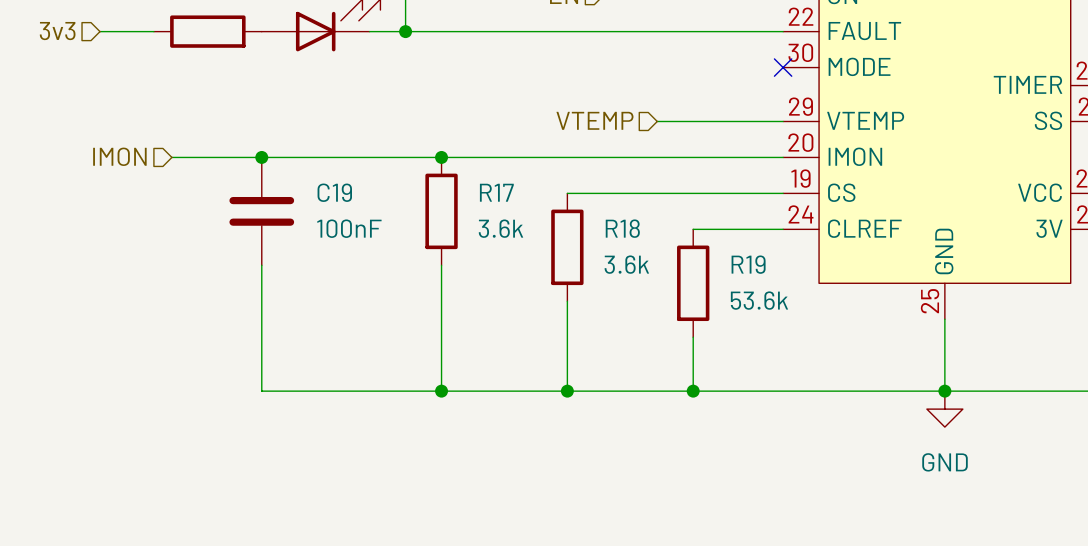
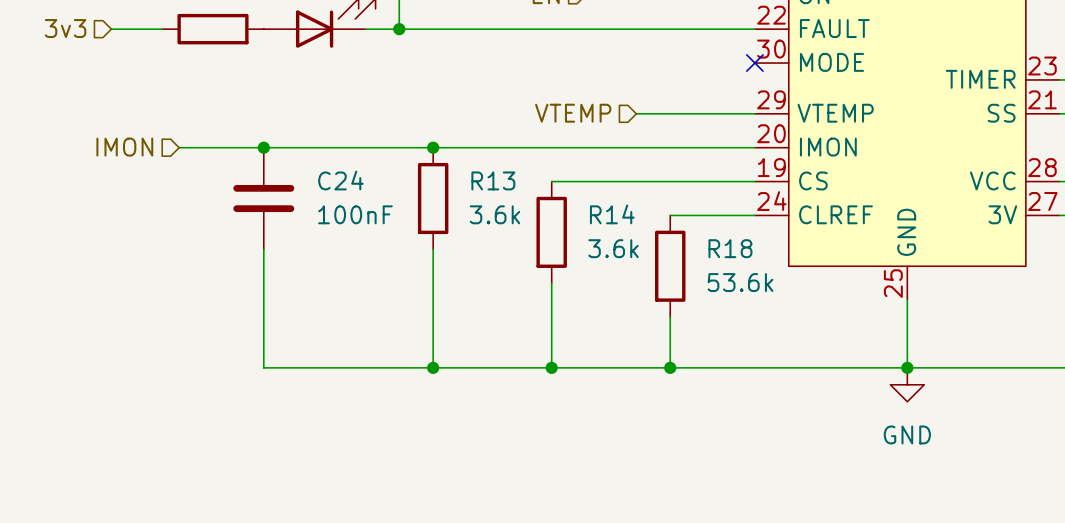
C19 name: C19 (334, 192) -> C24 (340, 180)
R17 name: R17 (496, 192) -> R13 (493, 180)
R18 name: R18 (622, 228) -> R14 (612, 214)
R19 name: R19 (748, 264) -> R18 (730, 248)

